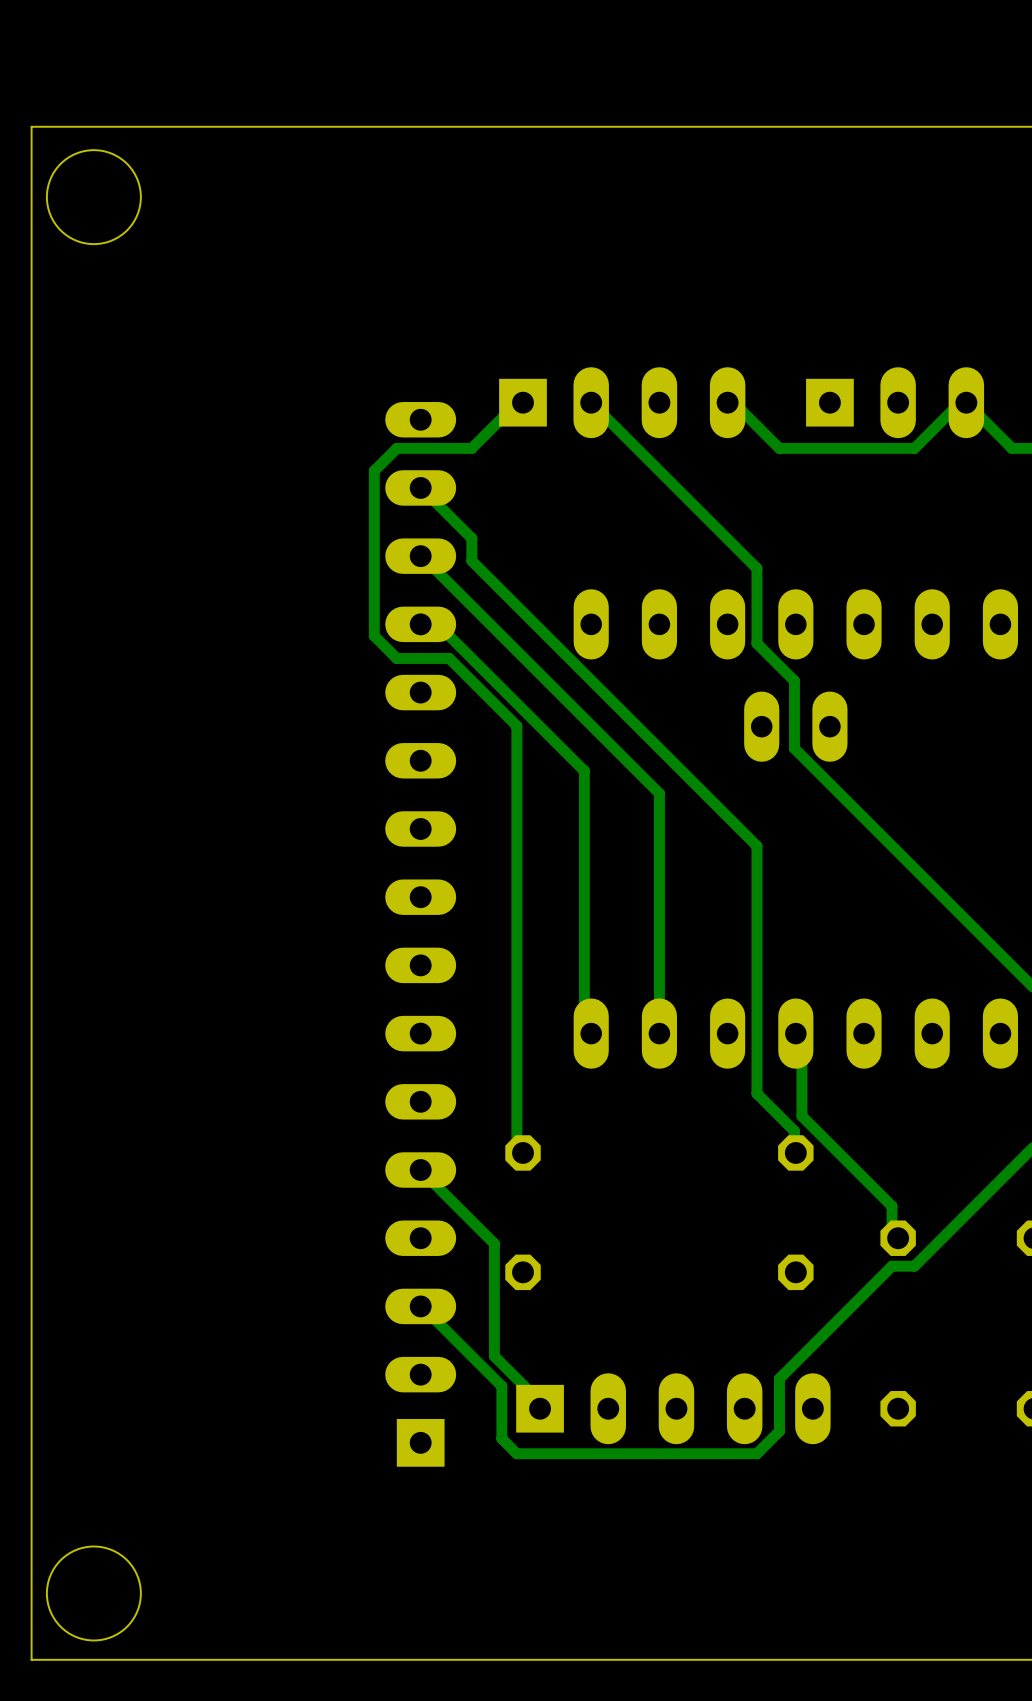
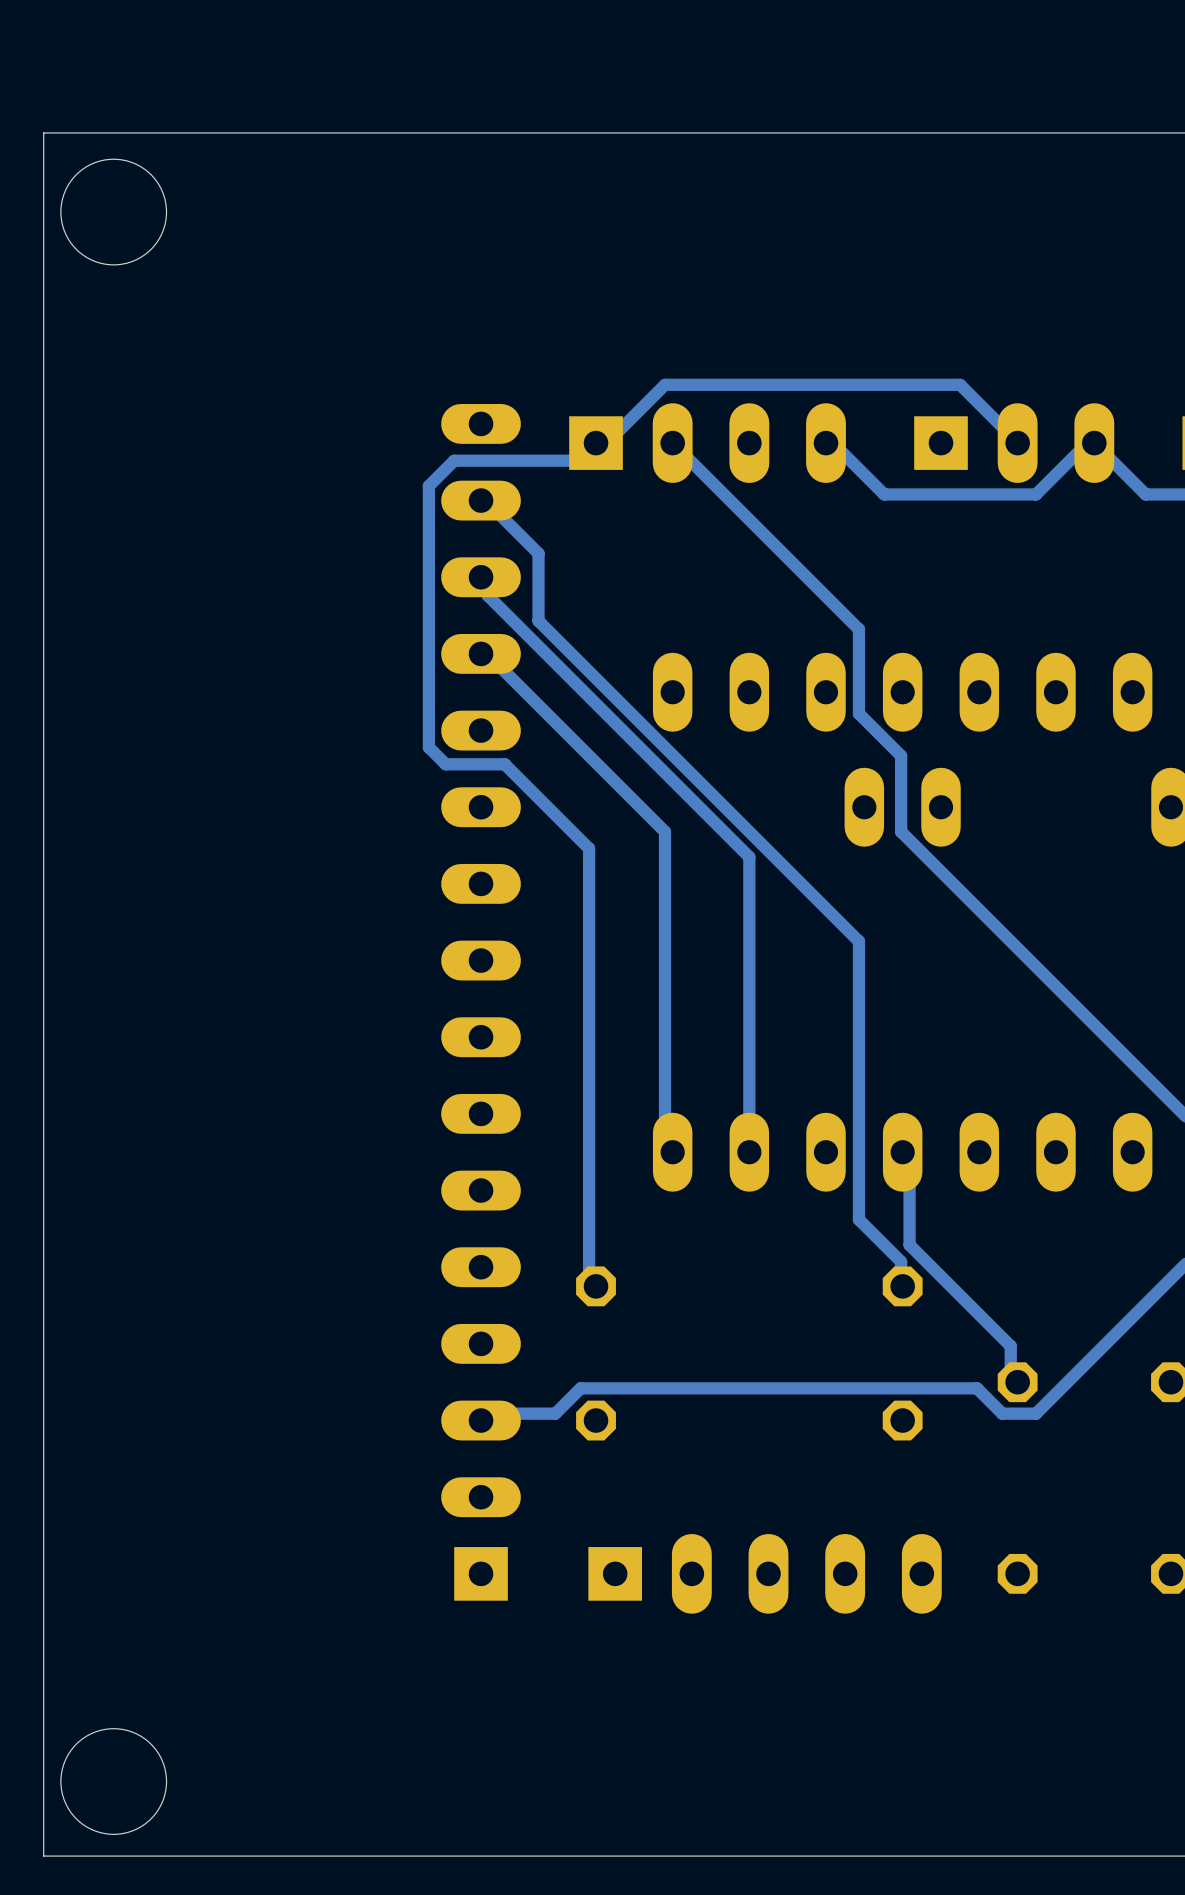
track: none -> (1017, 443) (960, 384) (665, 384) (614, 435) (597, 435) (596, 443)
track: (501, 418) (471, 448) (396, 448) (374, 470) -> (572, 460) (454, 460) (428, 486) (428, 519)
track: (420, 487) (471, 538) -> (481, 500) (487, 502) (538, 553) (538, 595)
track: (420, 556) (659, 793) -> (481, 577) (487, 578) (487, 595) (749, 857) (749, 882)
track: (420, 624) (426, 628) (441, 628) (584, 771) -> (481, 653) (487, 654) (665, 831) (665, 857)
track: (374, 635) (396, 658) (449, 658) (516, 725) (516, 763) -> (428, 705) (428, 747) (445, 764) (504, 764) (589, 848)
part position: (420, 934) -> (481, 1002)
track: (420, 1170) (494, 1243) (494, 1356) (546, 1408) (540, 1408) -> none
track: (892, 1266) (779, 1378) (779, 1431) (756, 1453) (516, 1453) (501, 1438) (501, 1386) (420, 1306) -> (1010, 1413) (1002, 1413) (977, 1388) (580, 1388) (555, 1413) (487, 1413) (481, 1420)

